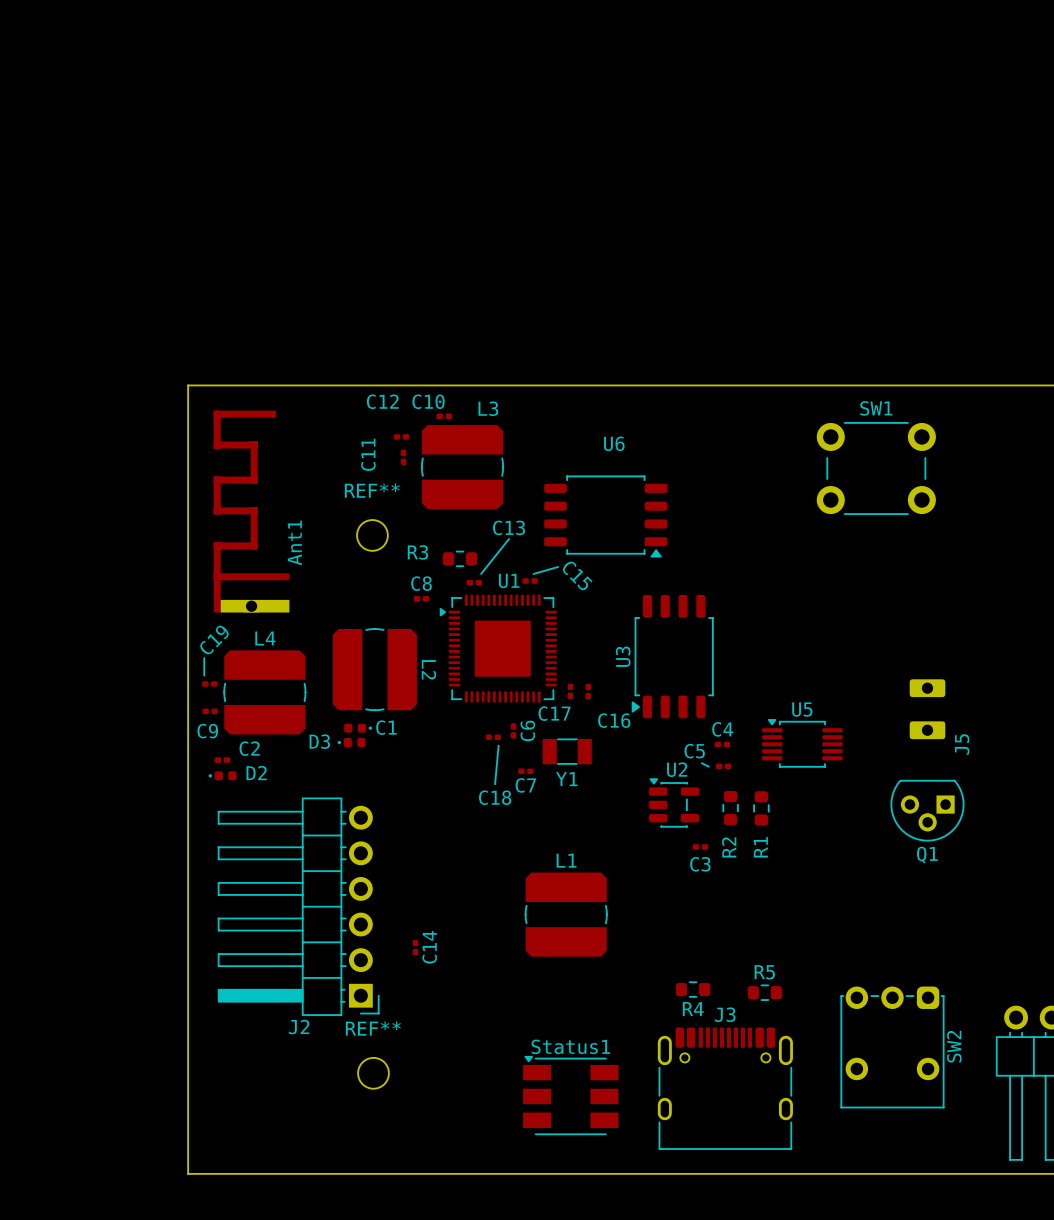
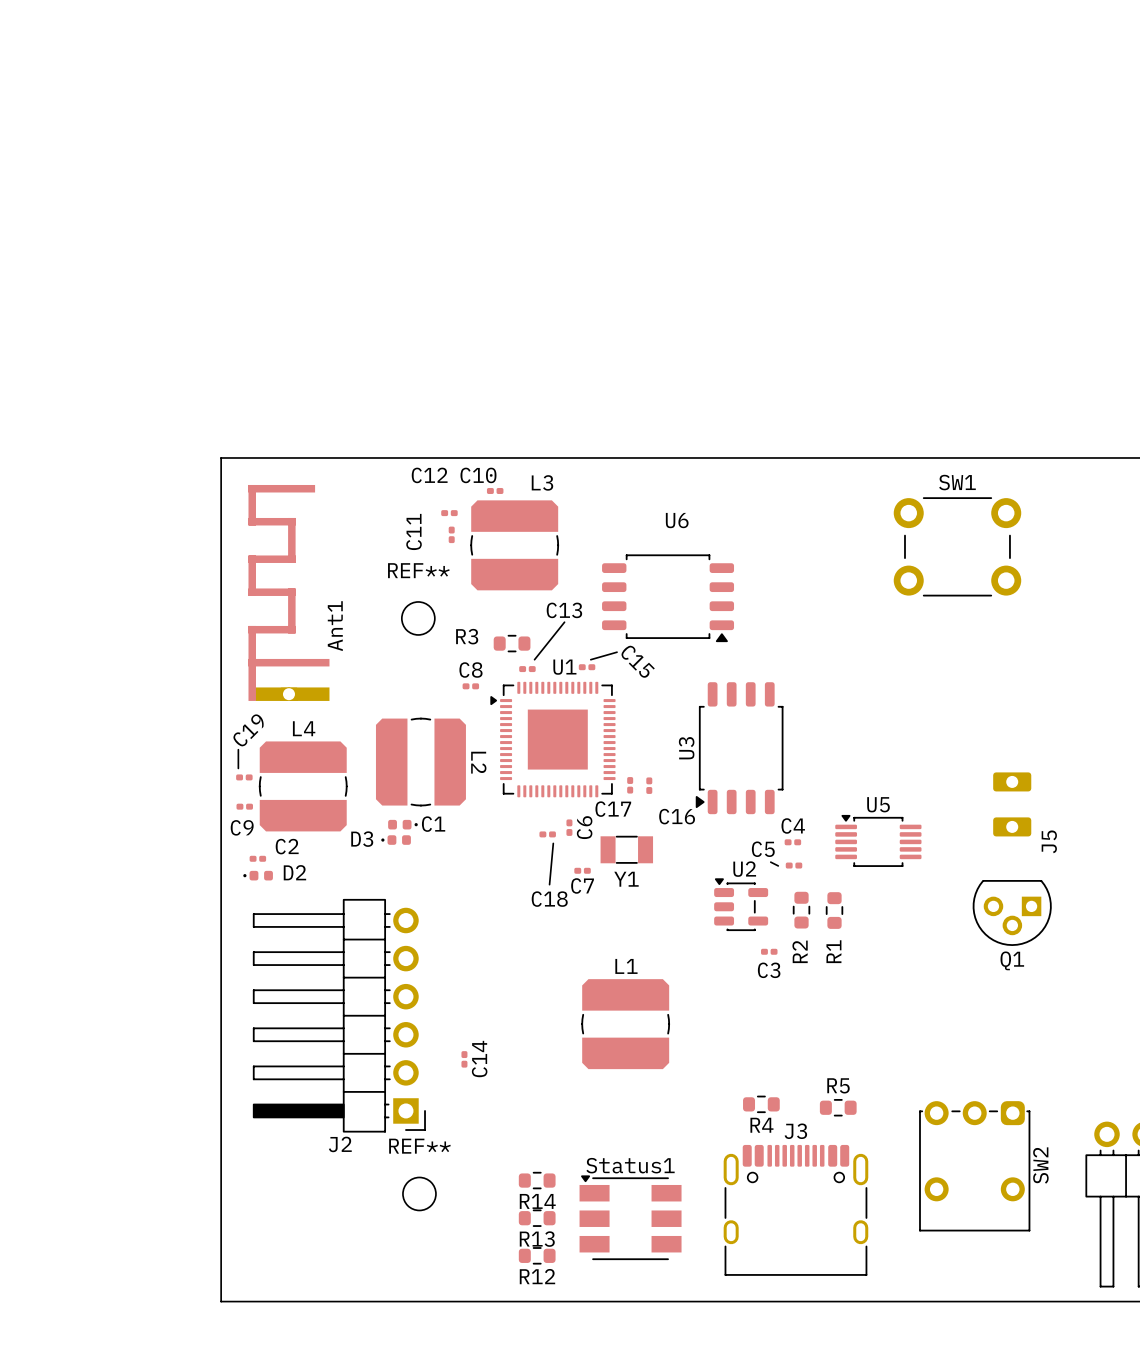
R14: none -> (537, 1180)
R13: none -> (537, 1218)
R12: none -> (537, 1255)

